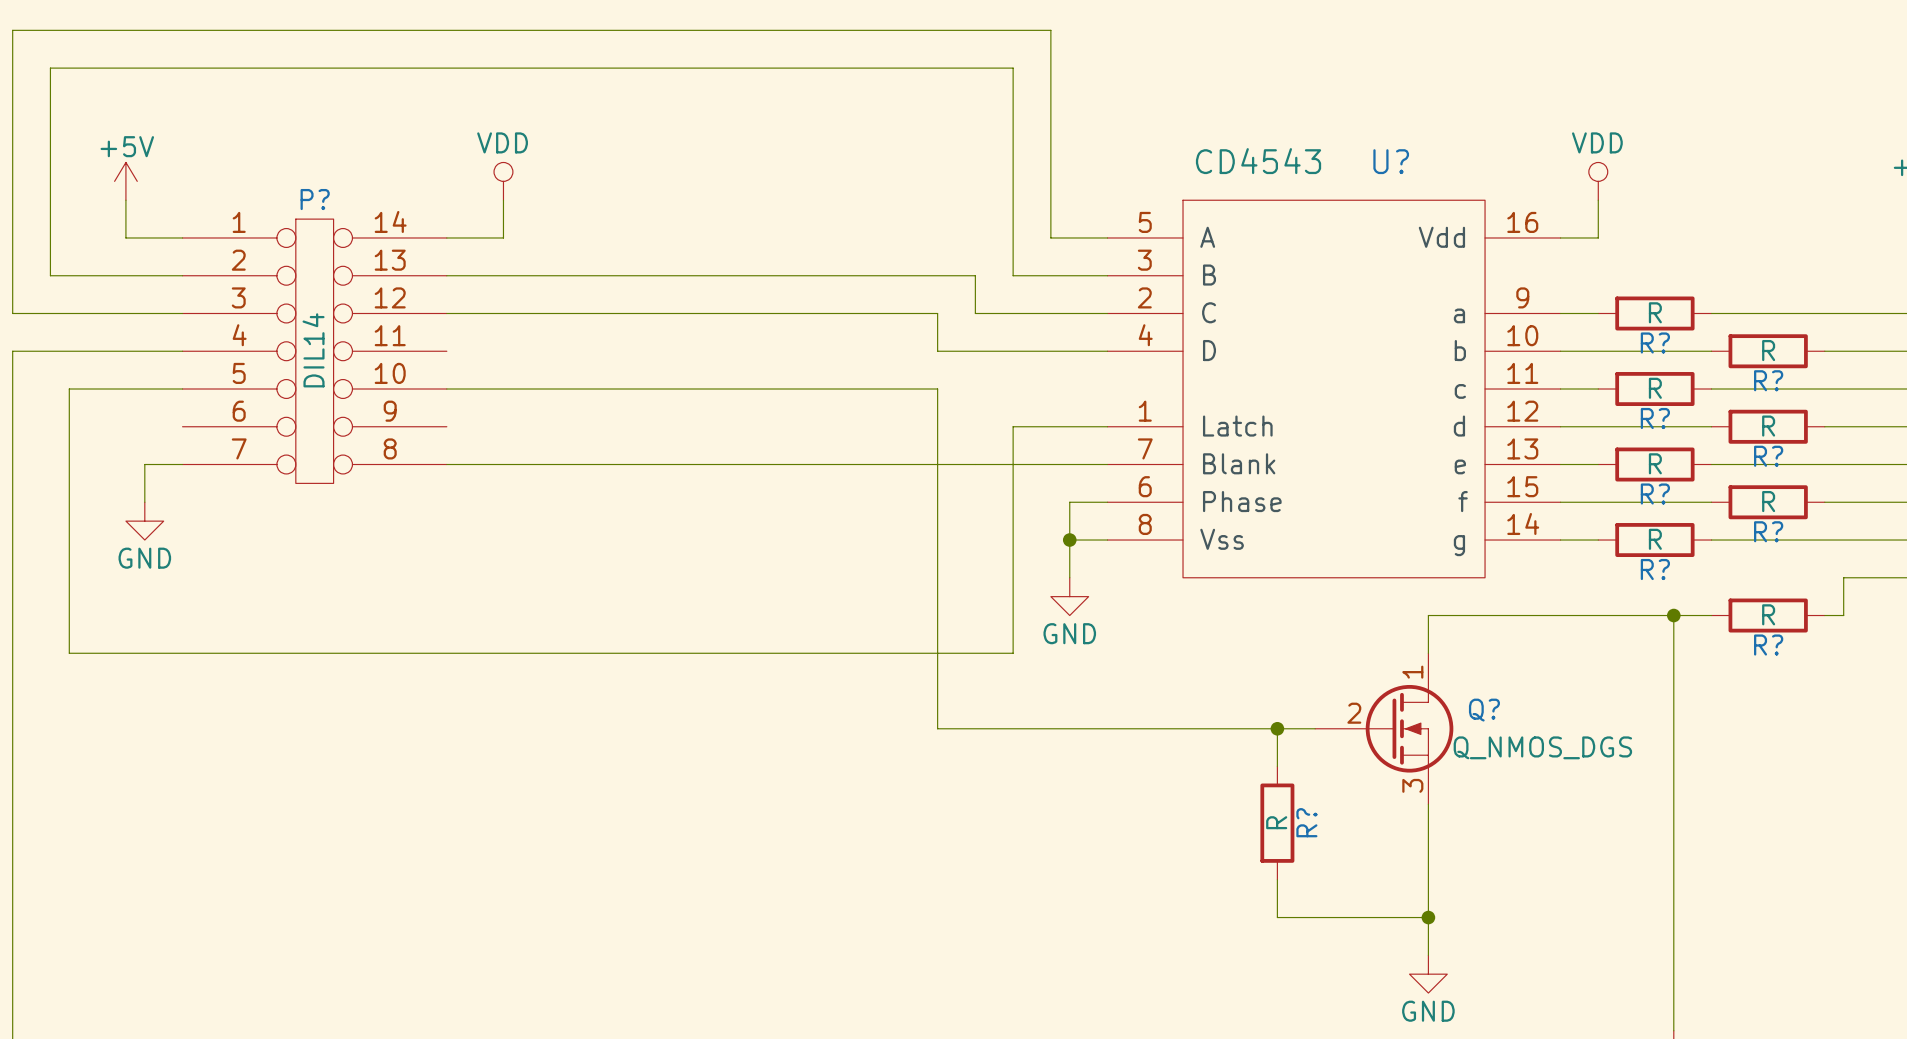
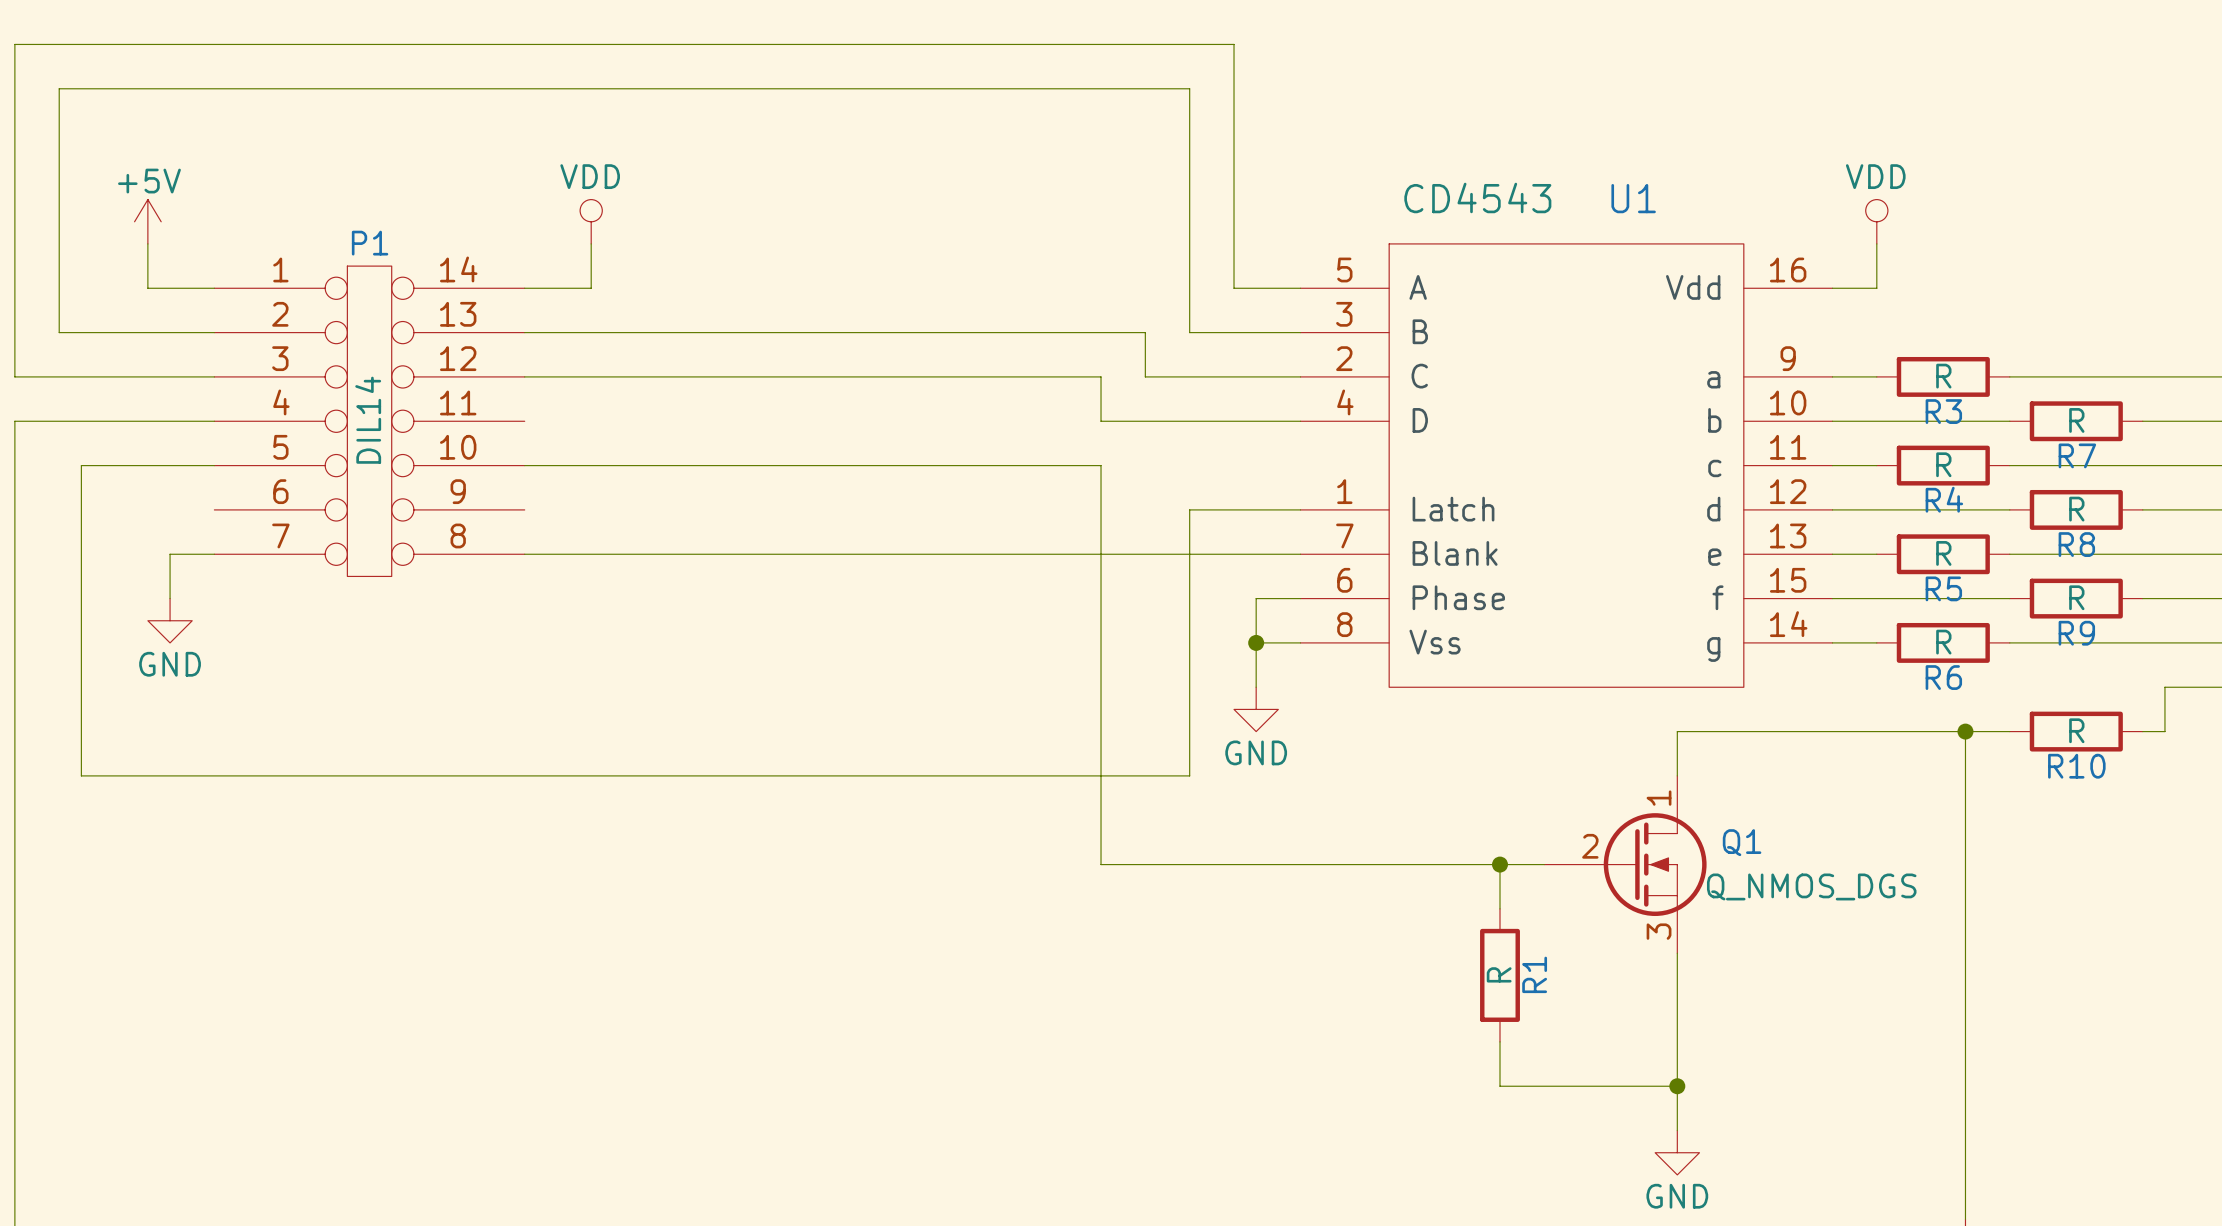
U? name: U? (1391, 161) -> U1 (1633, 198)
P? name: P? (315, 199) -> P1 (370, 243)
R? name: R? (1655, 342) -> R3 (1943, 411)
R? name: R? (1768, 380) -> R7 (2077, 455)
R? name: R? (1655, 418) -> R4 (1944, 499)
R? name: R? (1768, 456) -> R8 (2076, 544)
R? name: R? (1655, 494) -> R5 (1943, 588)
R? name: R? (1768, 531) -> R9 (2076, 633)
R? name: R? (1655, 569) -> R6 (1943, 677)
R? name: R? (1768, 645) -> R10 (2076, 766)
Q? name: Q? (1484, 710) -> Q1 (1742, 842)
R? name: R? (1306, 822) -> R1 (1534, 974)

